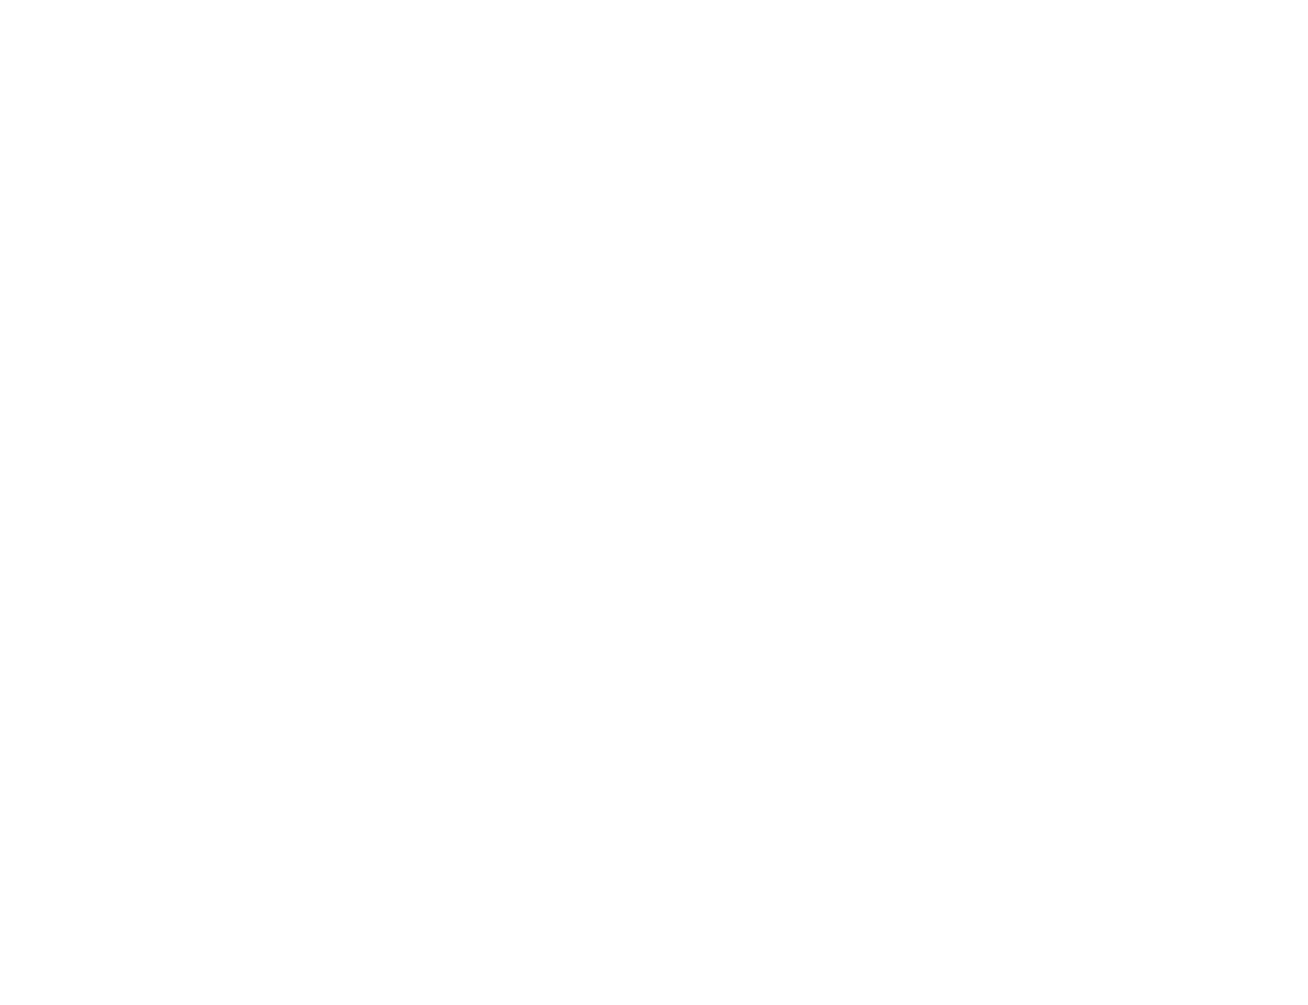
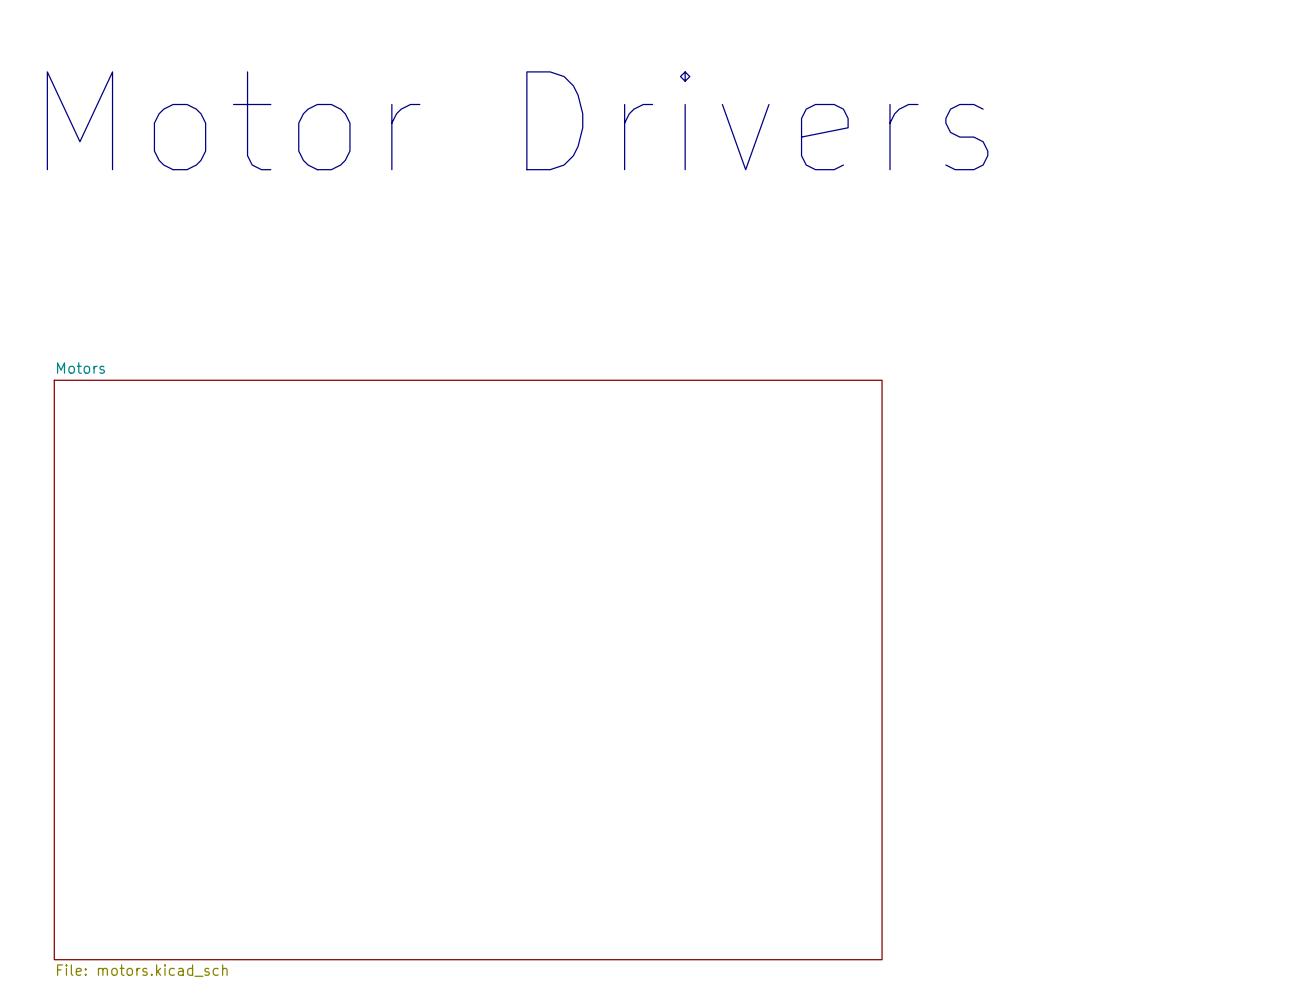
text: none -> Motor Drivers (517, 120)
sheet Motors: none -> File: motors.kicad_sch (468, 669)

